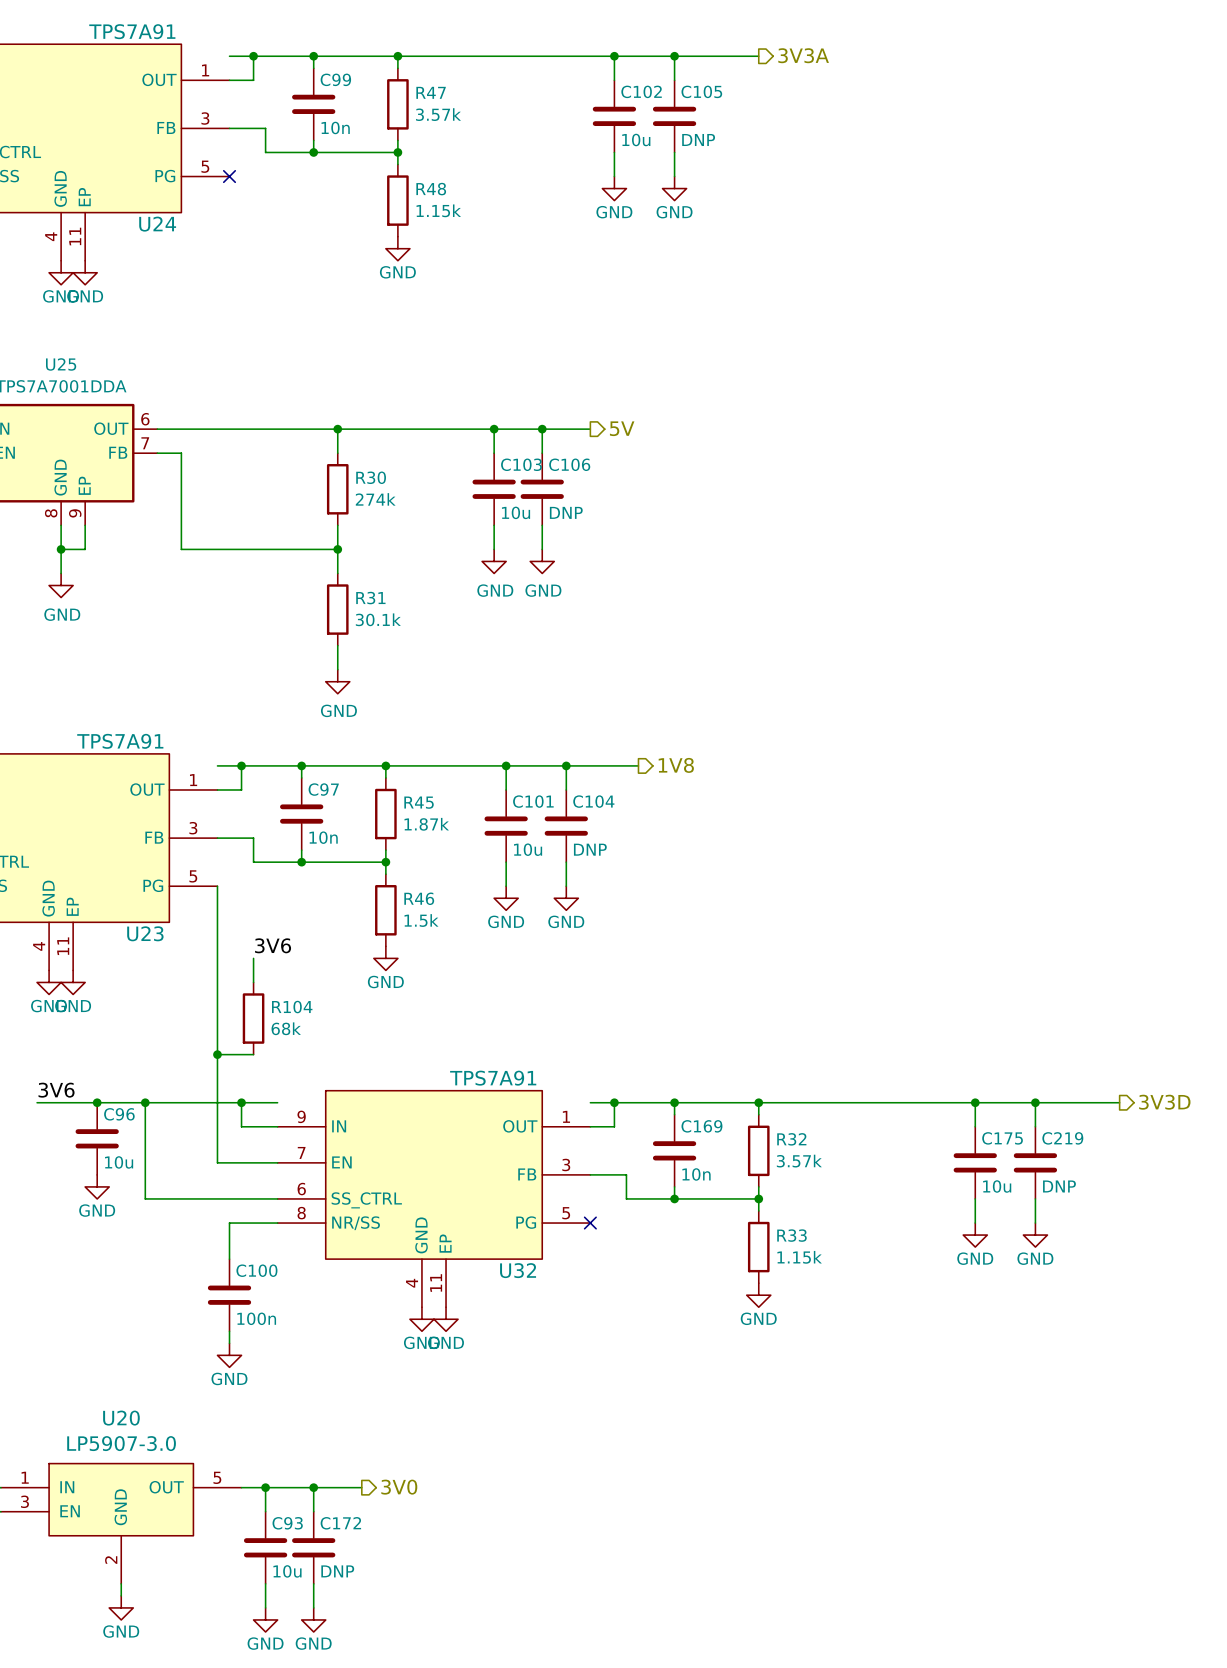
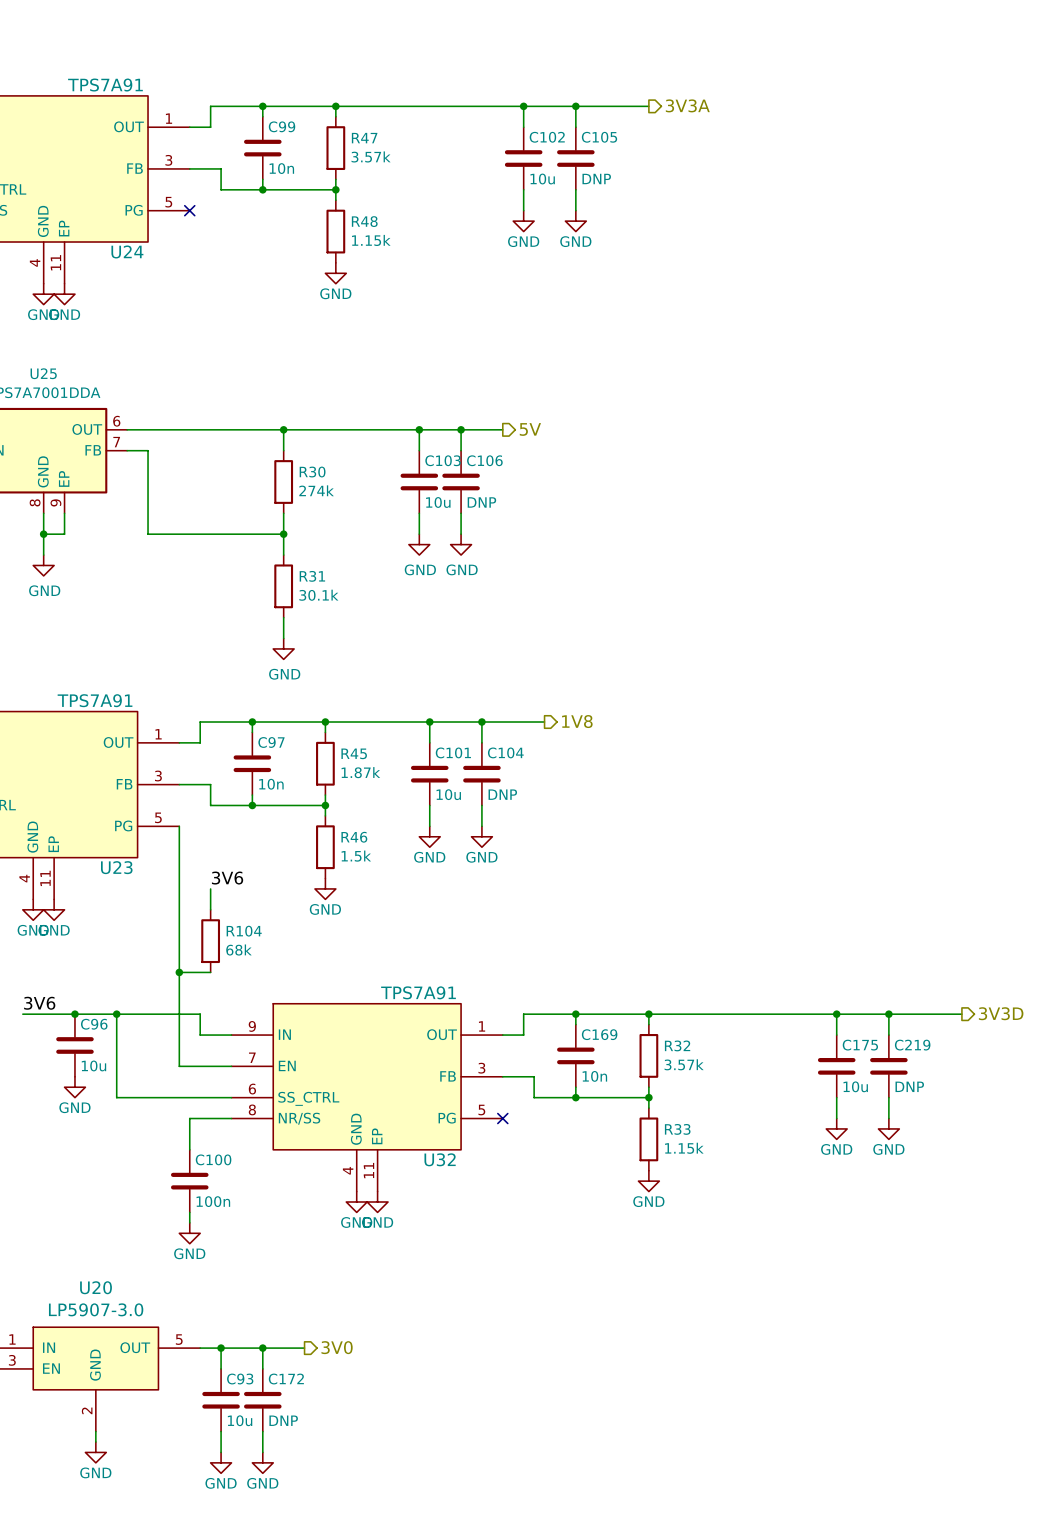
wire: (229, 56) (253, 56) -> none
junction: (253, 56) -> none
wire: (217, 765) (241, 765) -> none
junction: (241, 765) -> none
wire: (241, 1102) (277, 1102) -> none
junction: (241, 1102) -> none
wire: (590, 1102) (614, 1102) -> none
junction: (614, 1102) -> none

